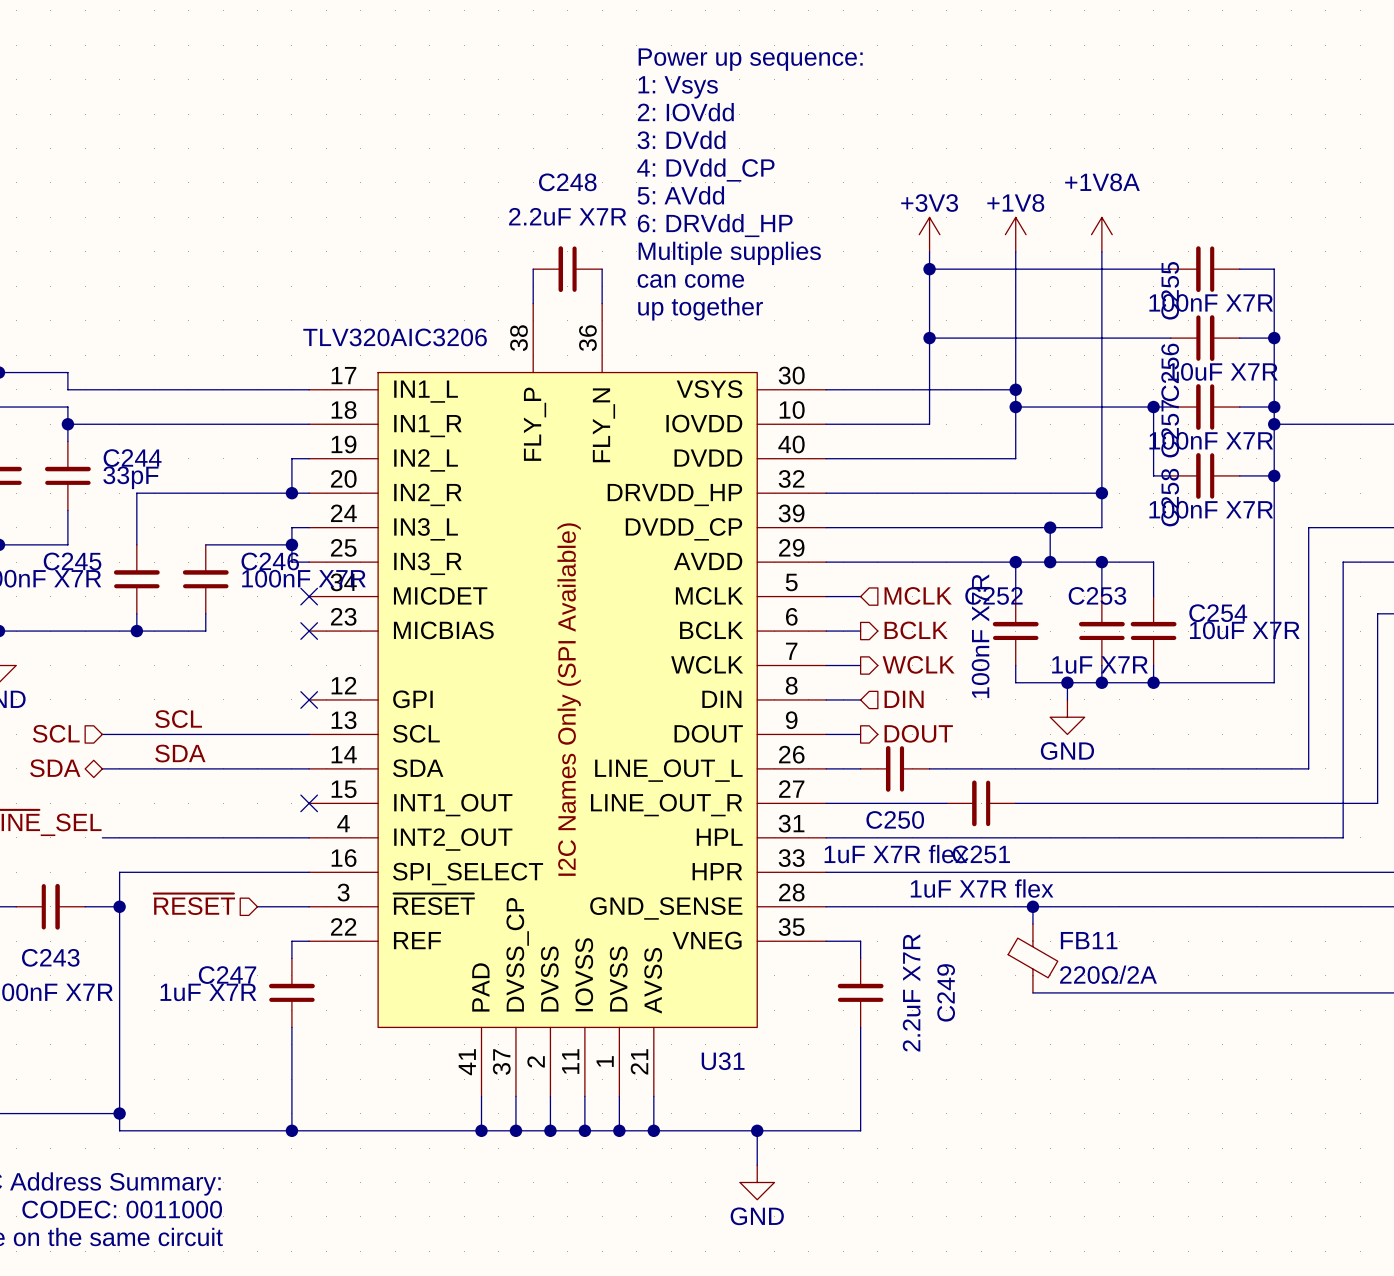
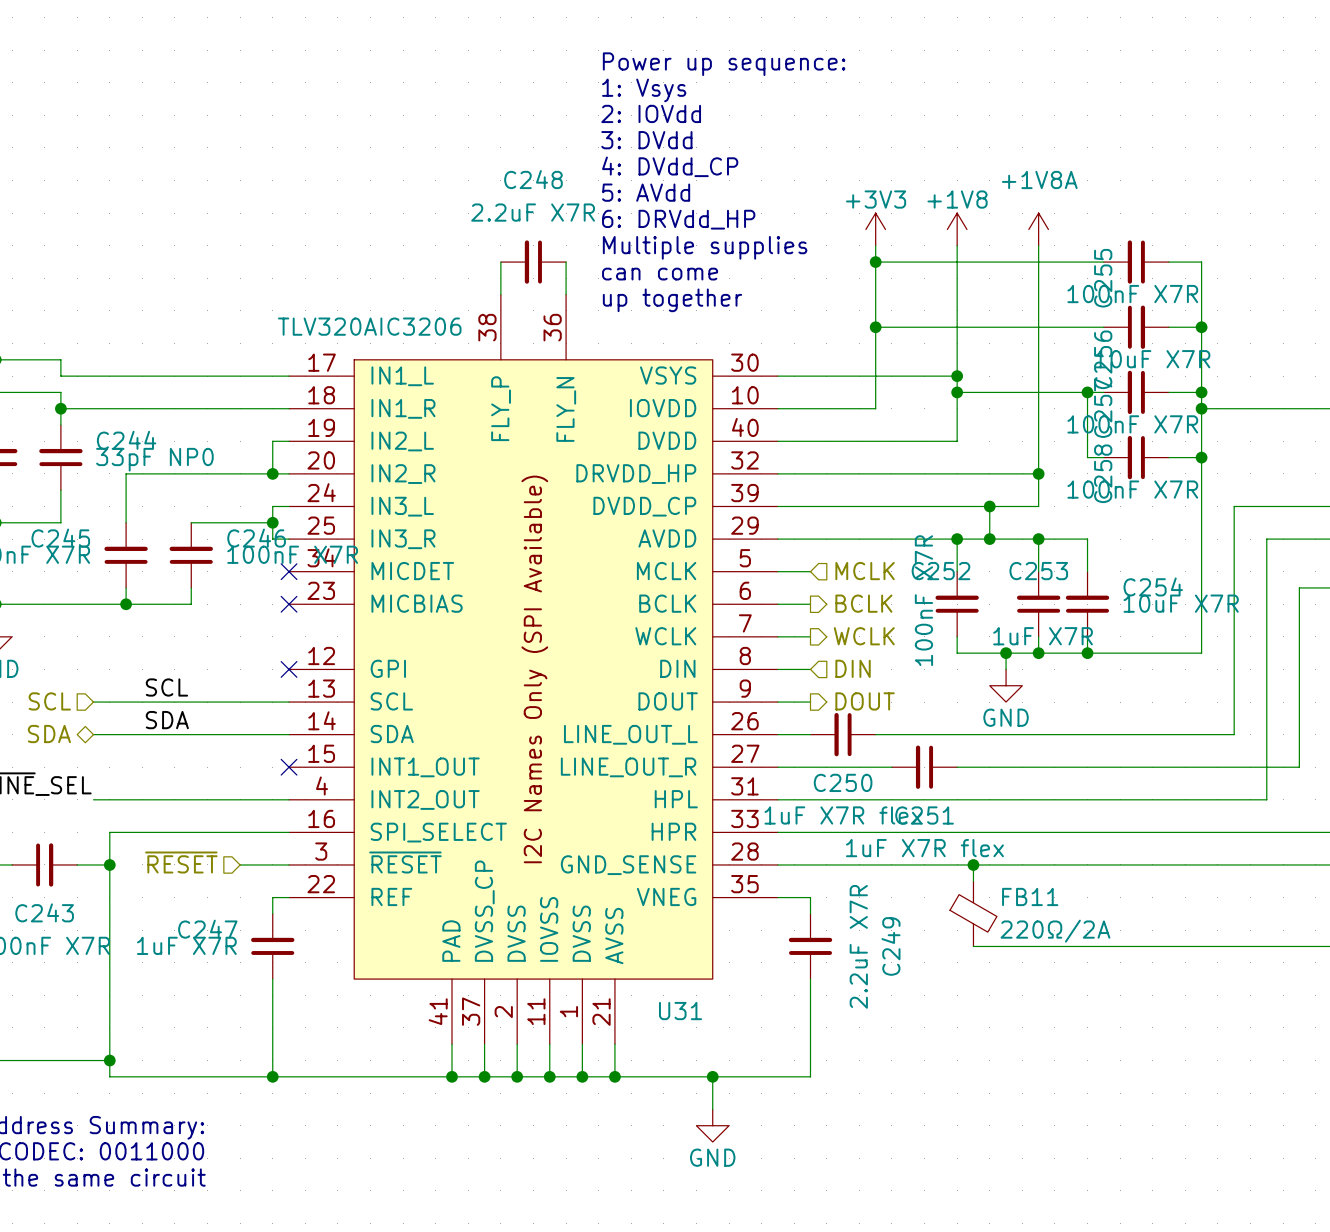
C244 value: 33pF (130, 477) -> 33pF NP0 (154, 459)

